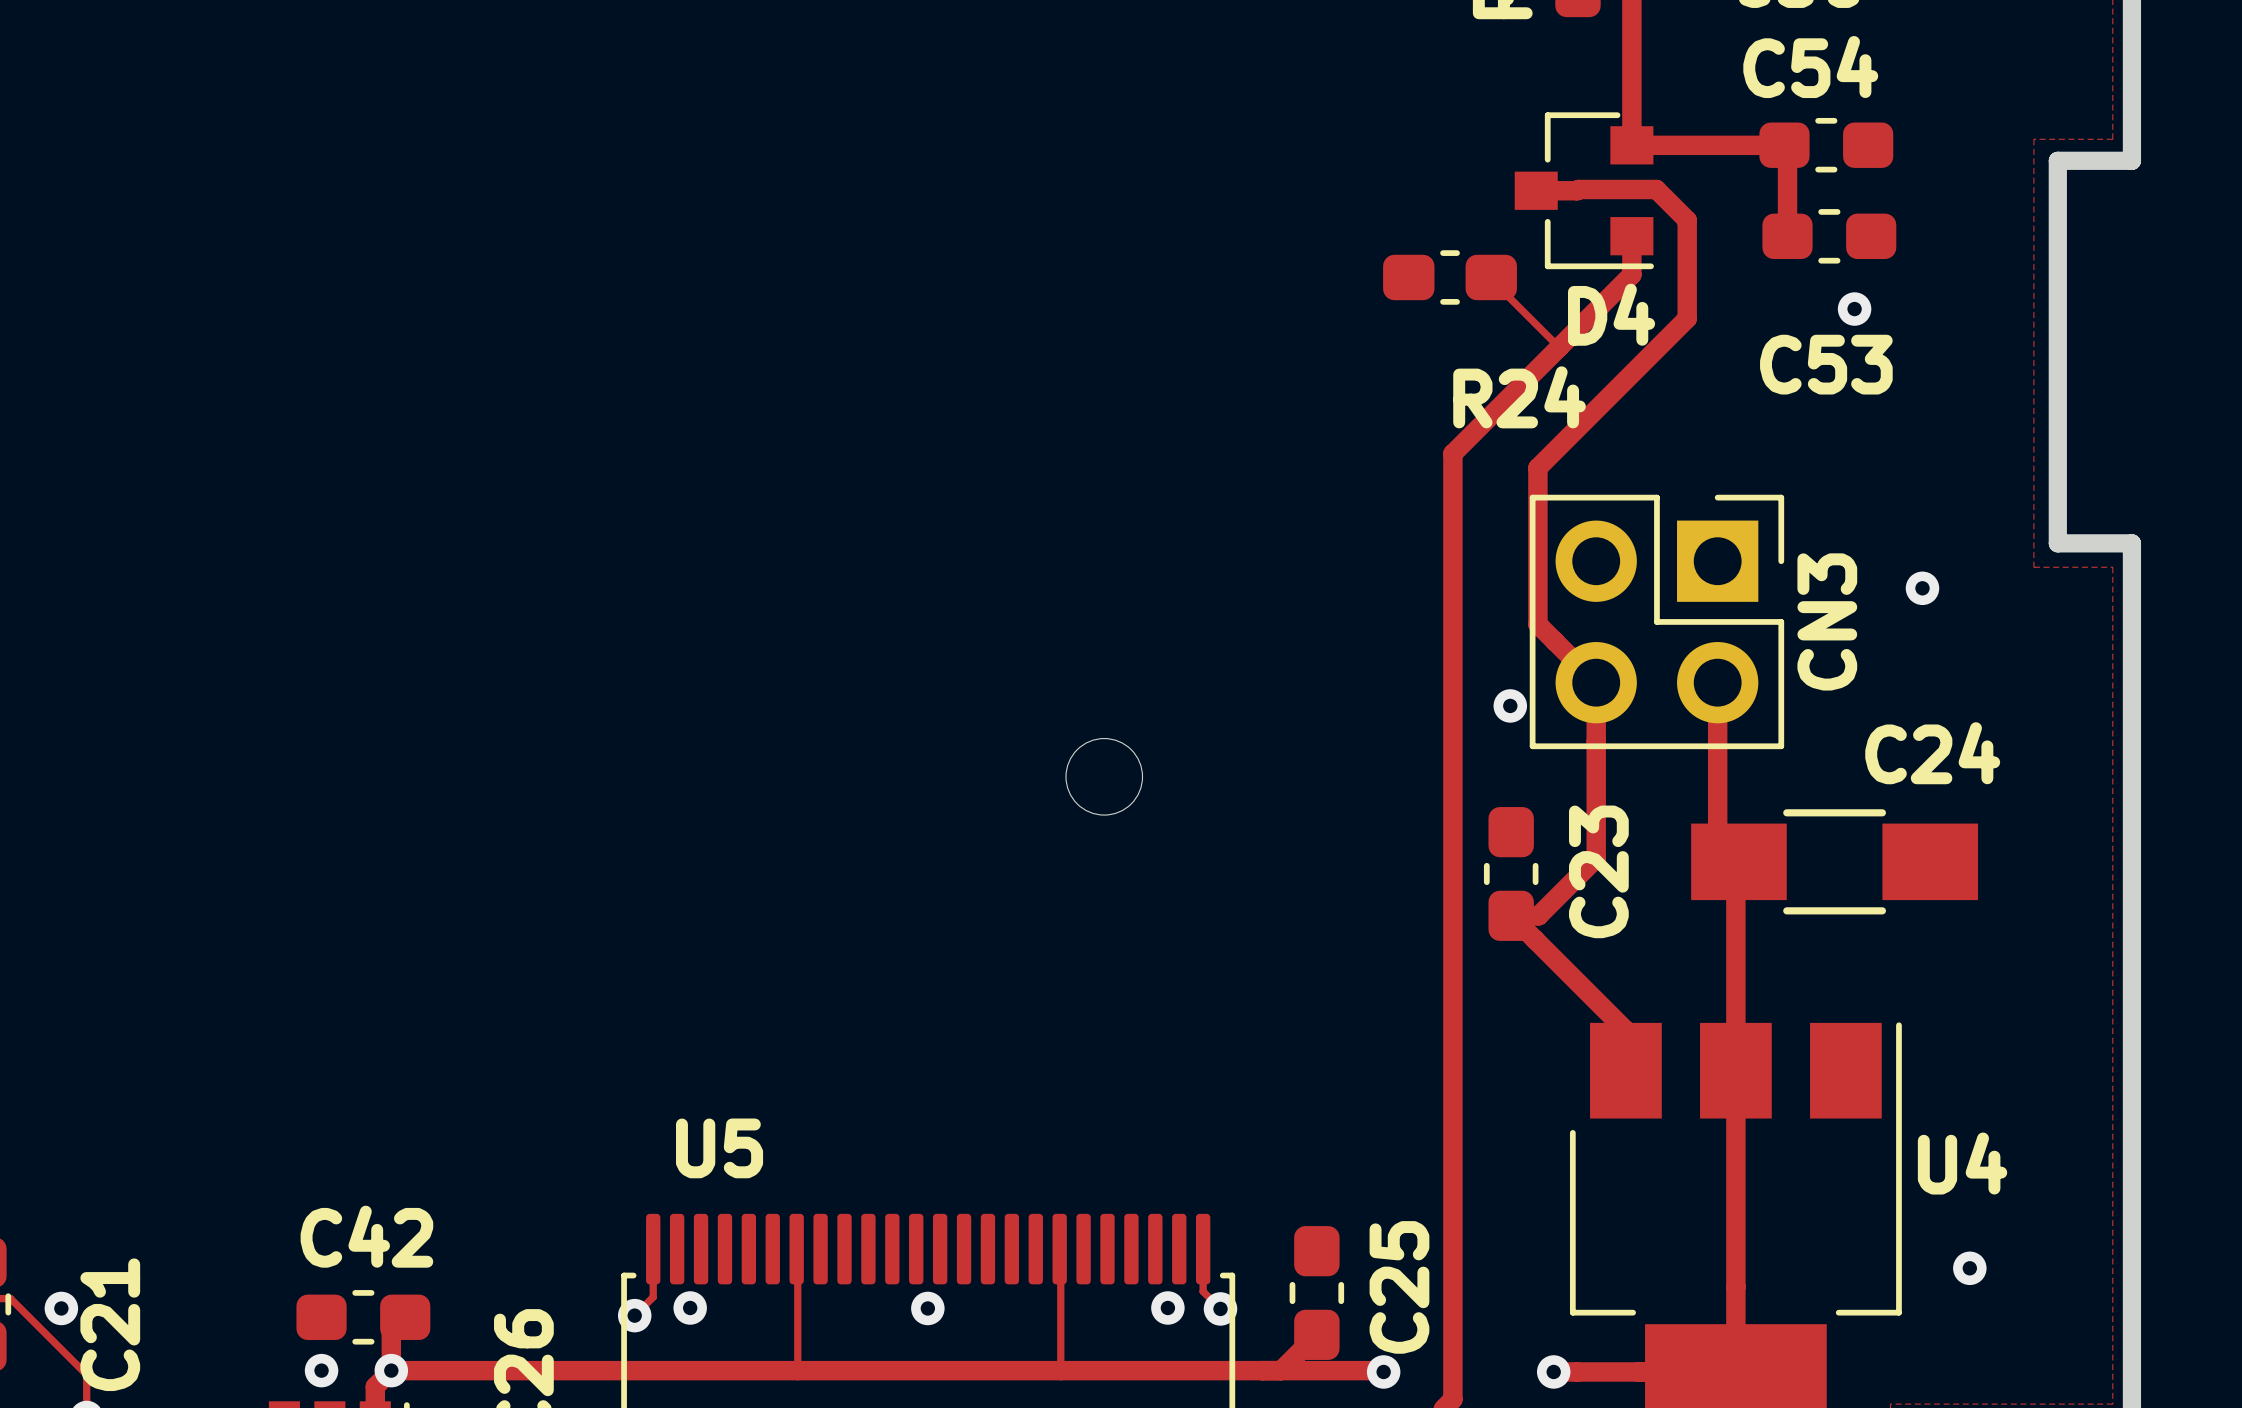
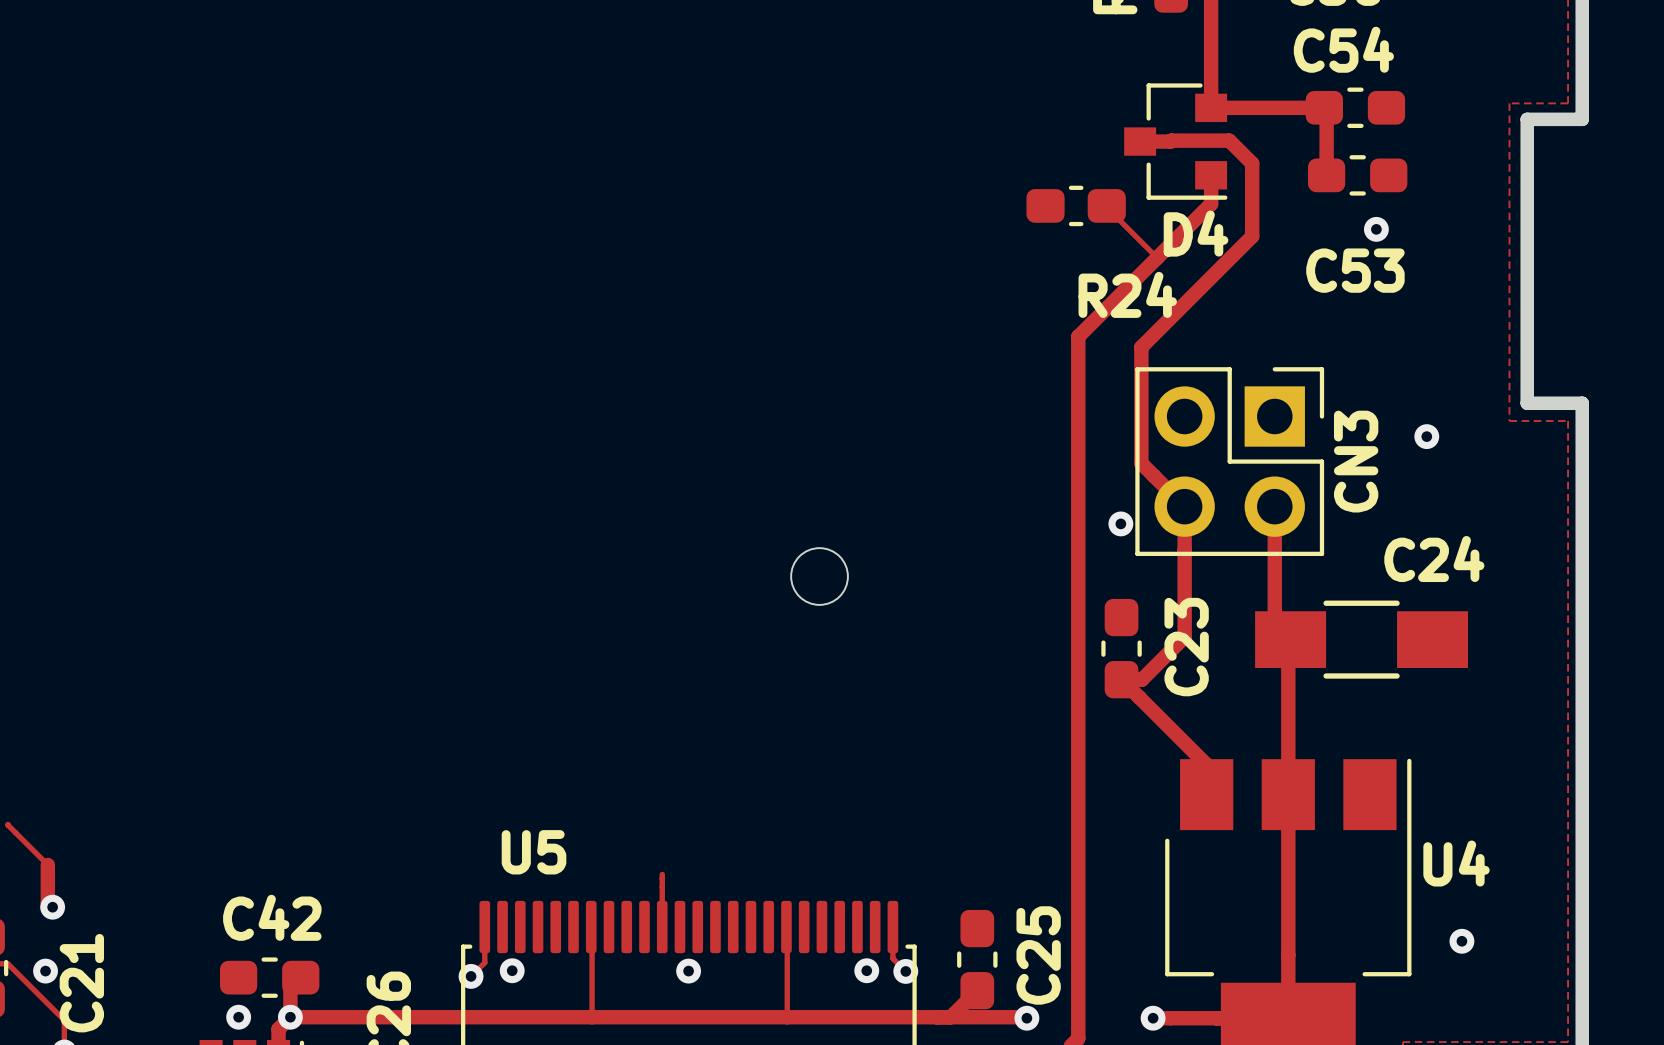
track: none -> (8, 824) (47, 864) (47, 902) (52, 907)
track: none -> (662, 874) (662, 925)
via: none -> (52, 907)

